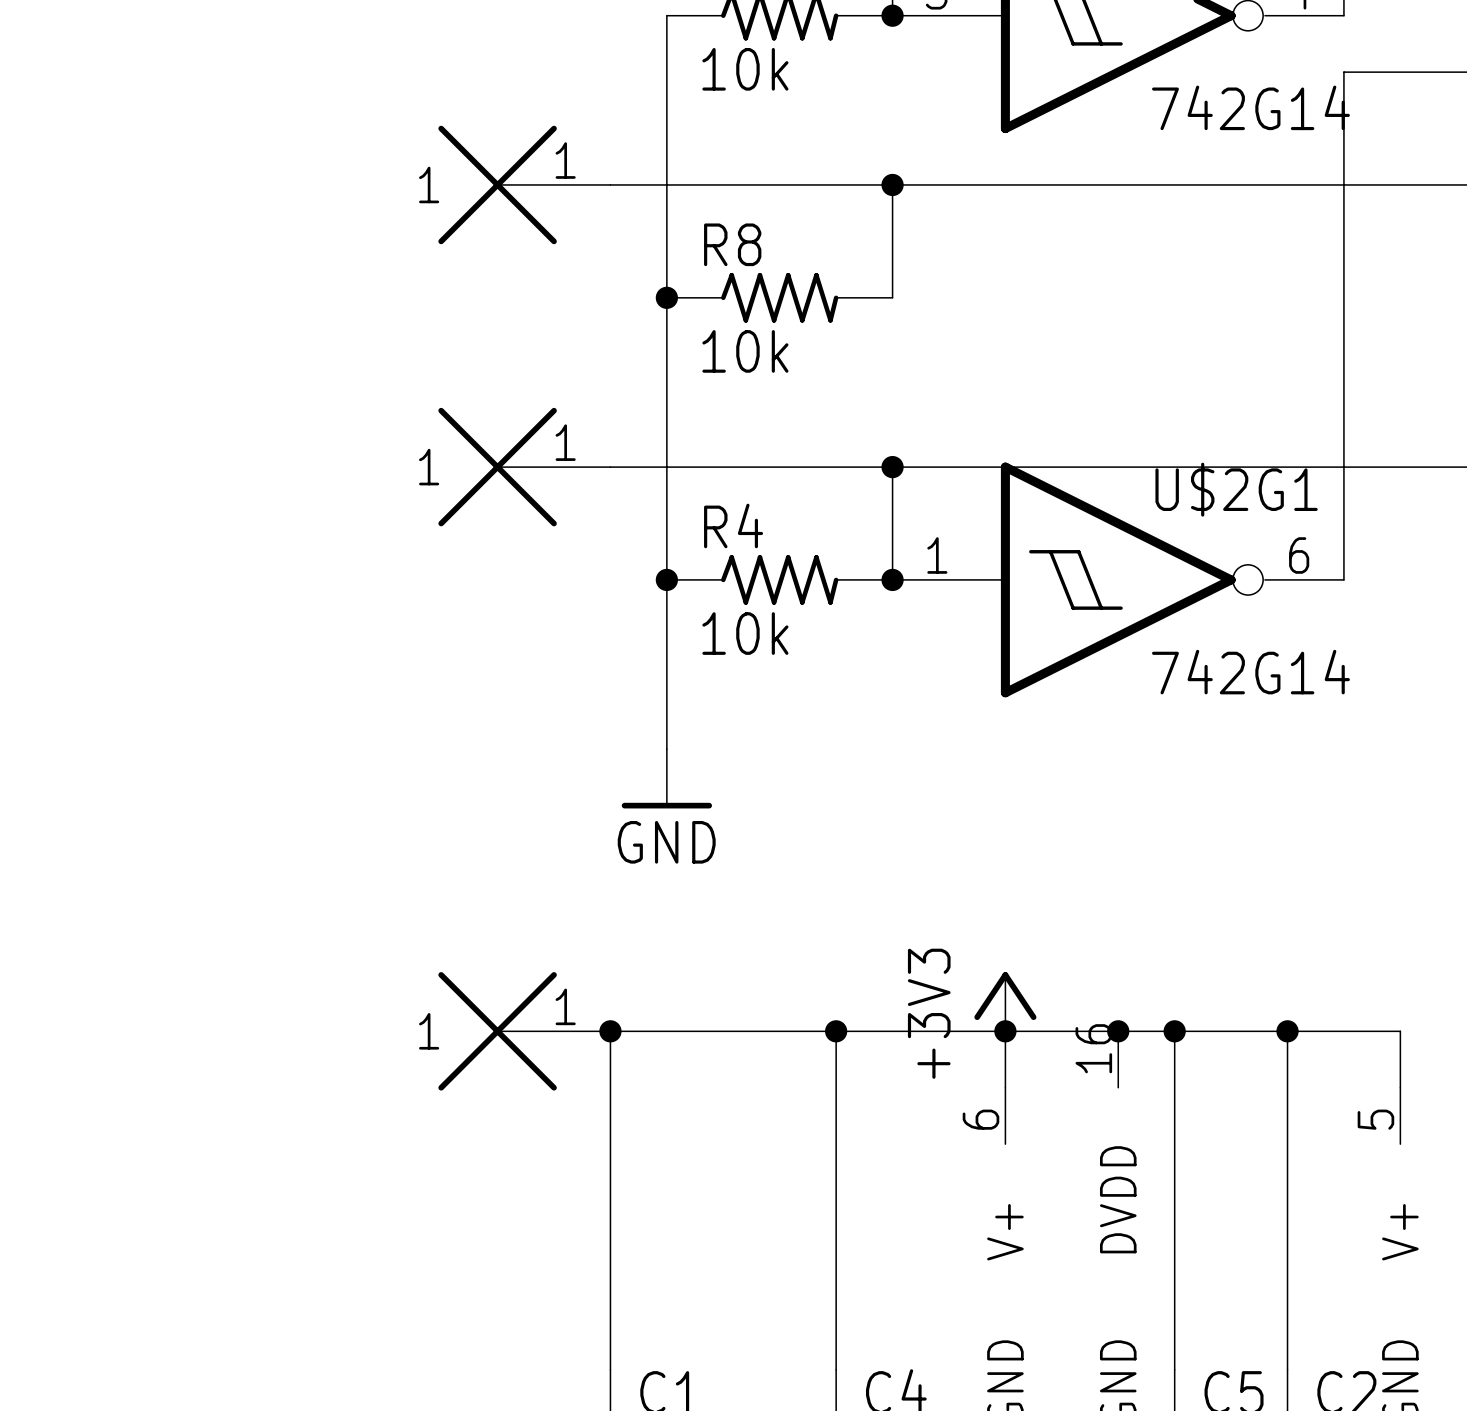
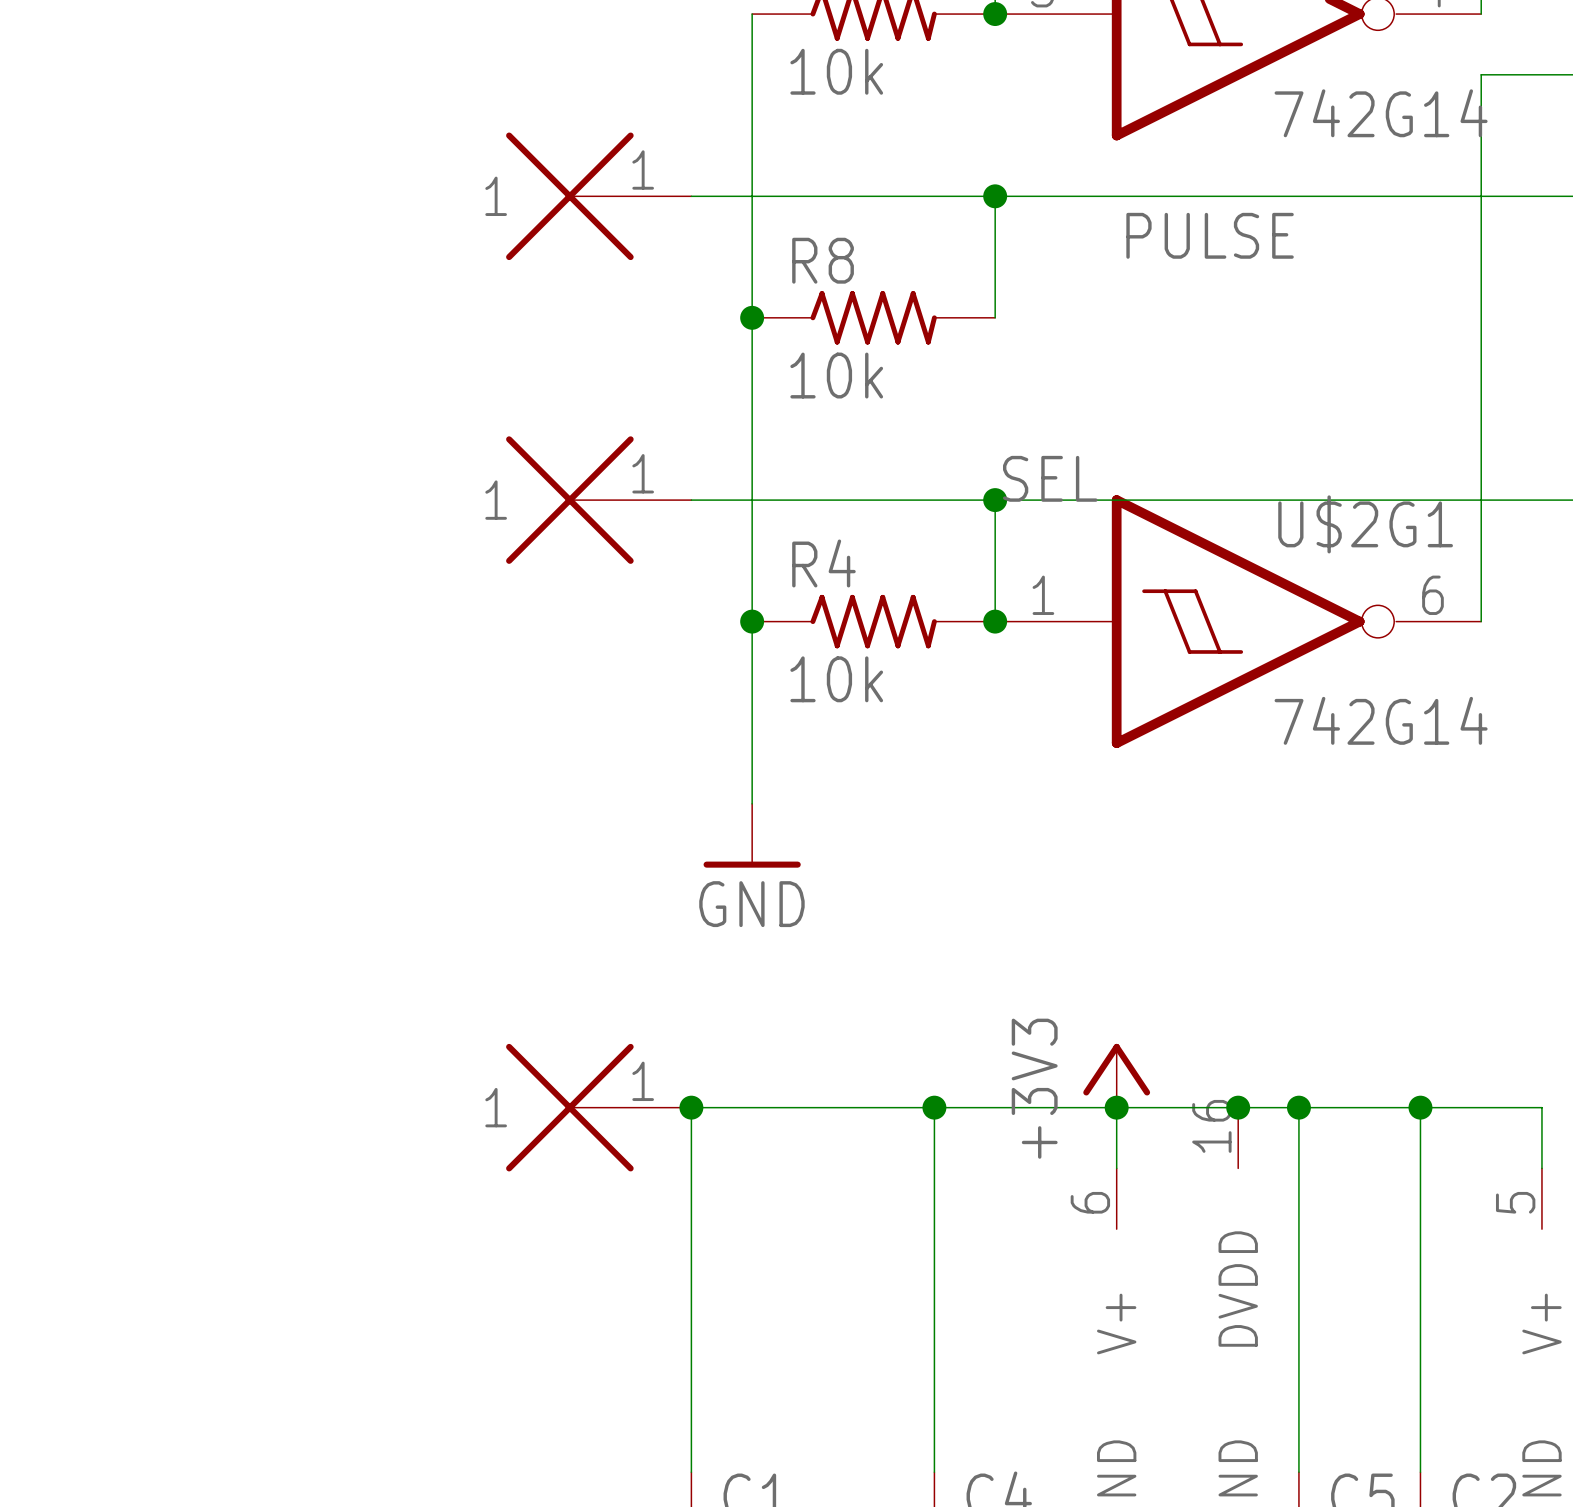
label: none -> PULSE (1210, 235)
label: none -> SEL (1050, 478)

